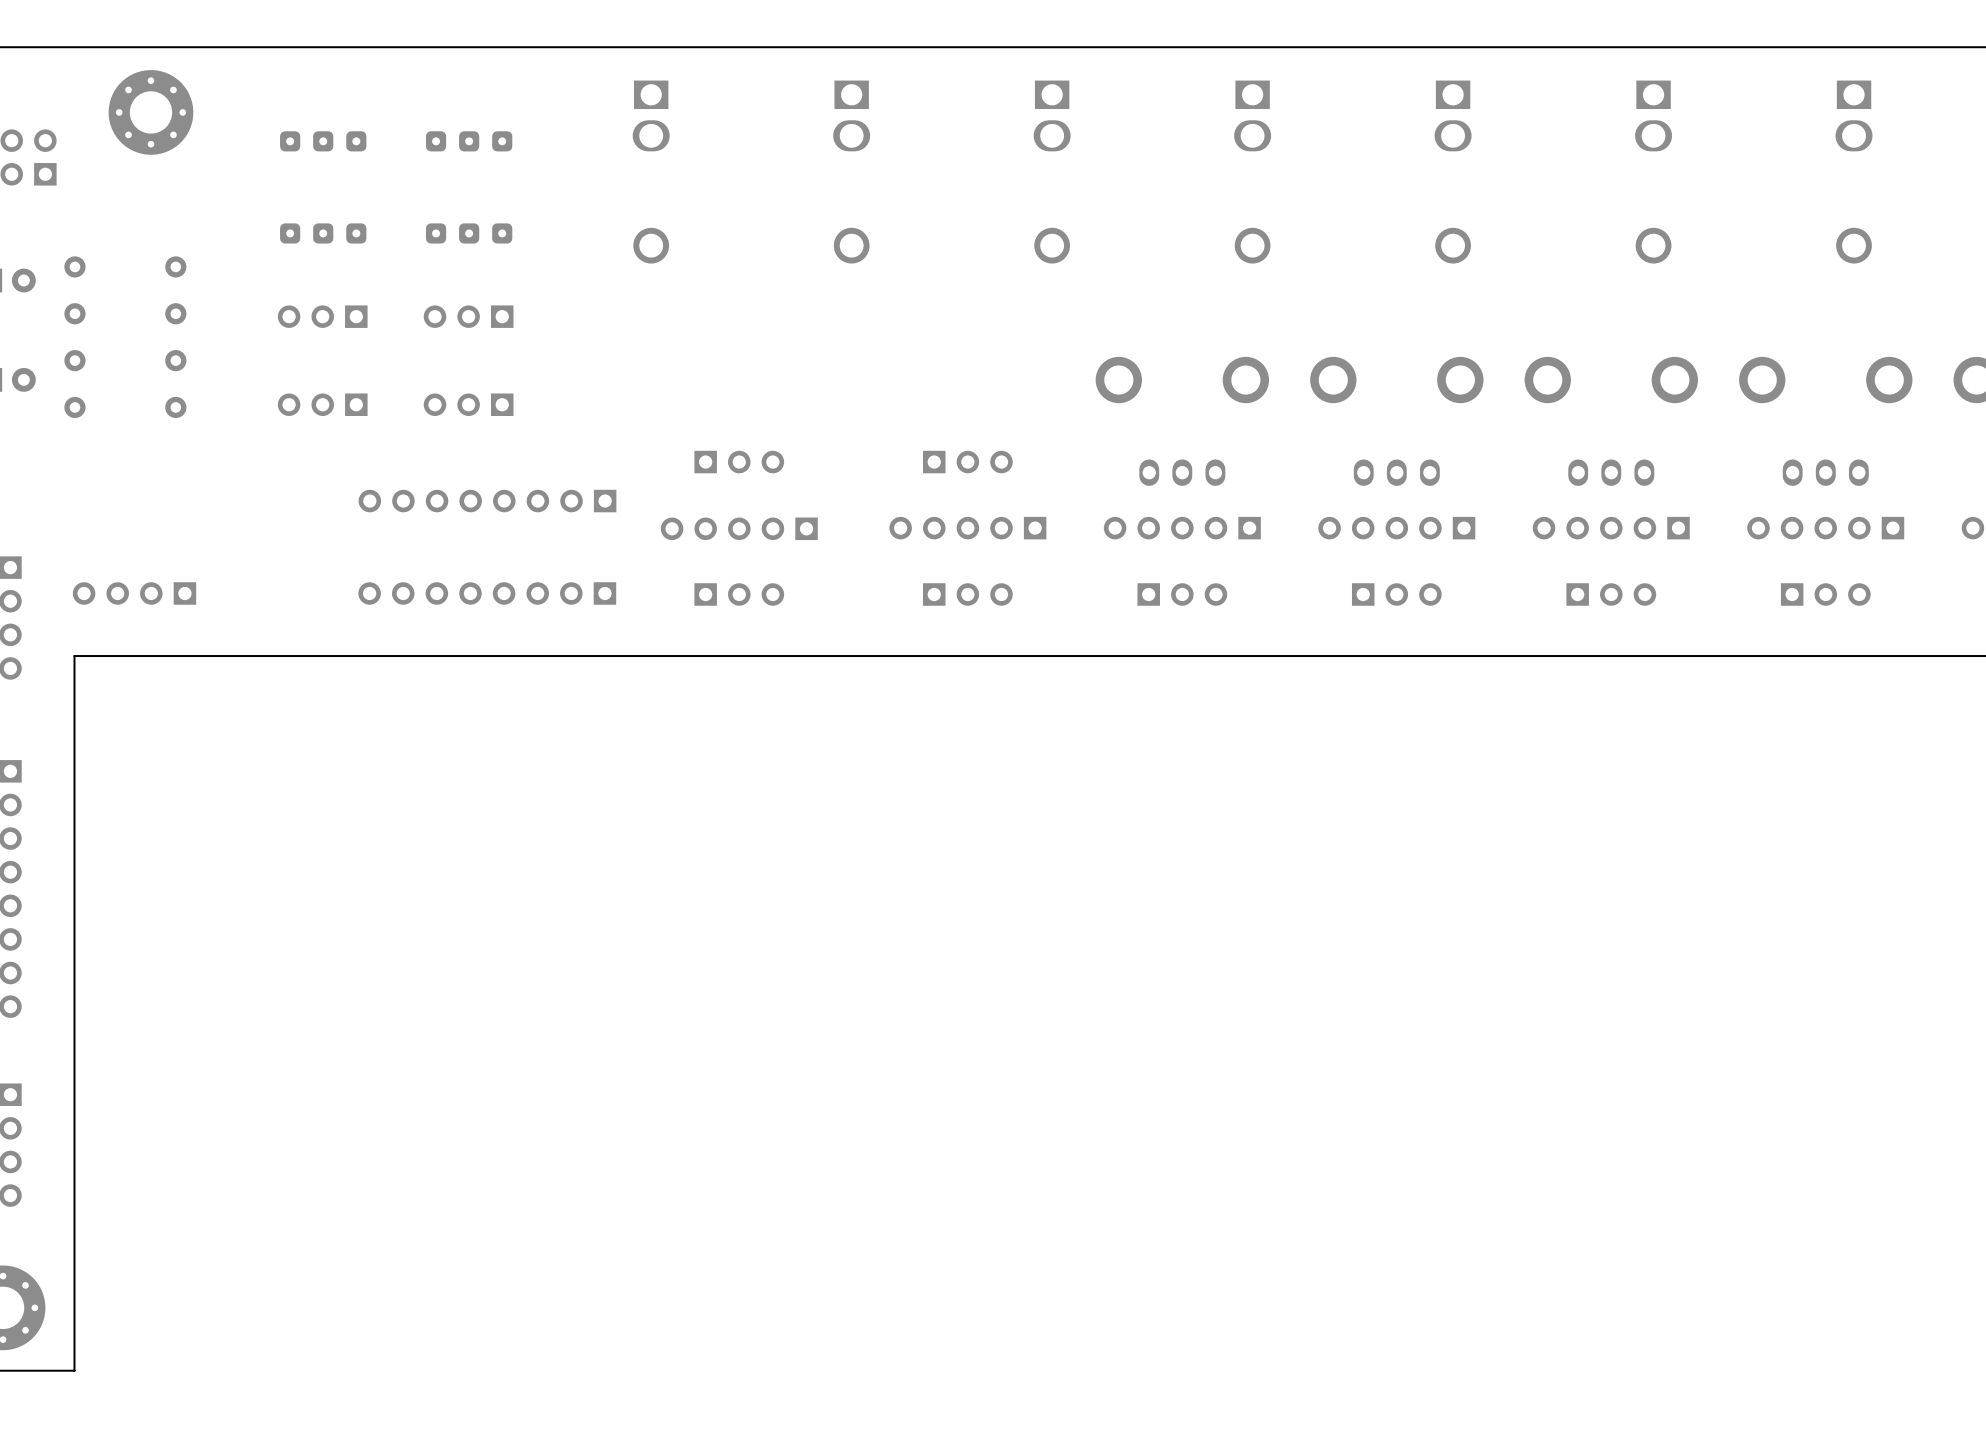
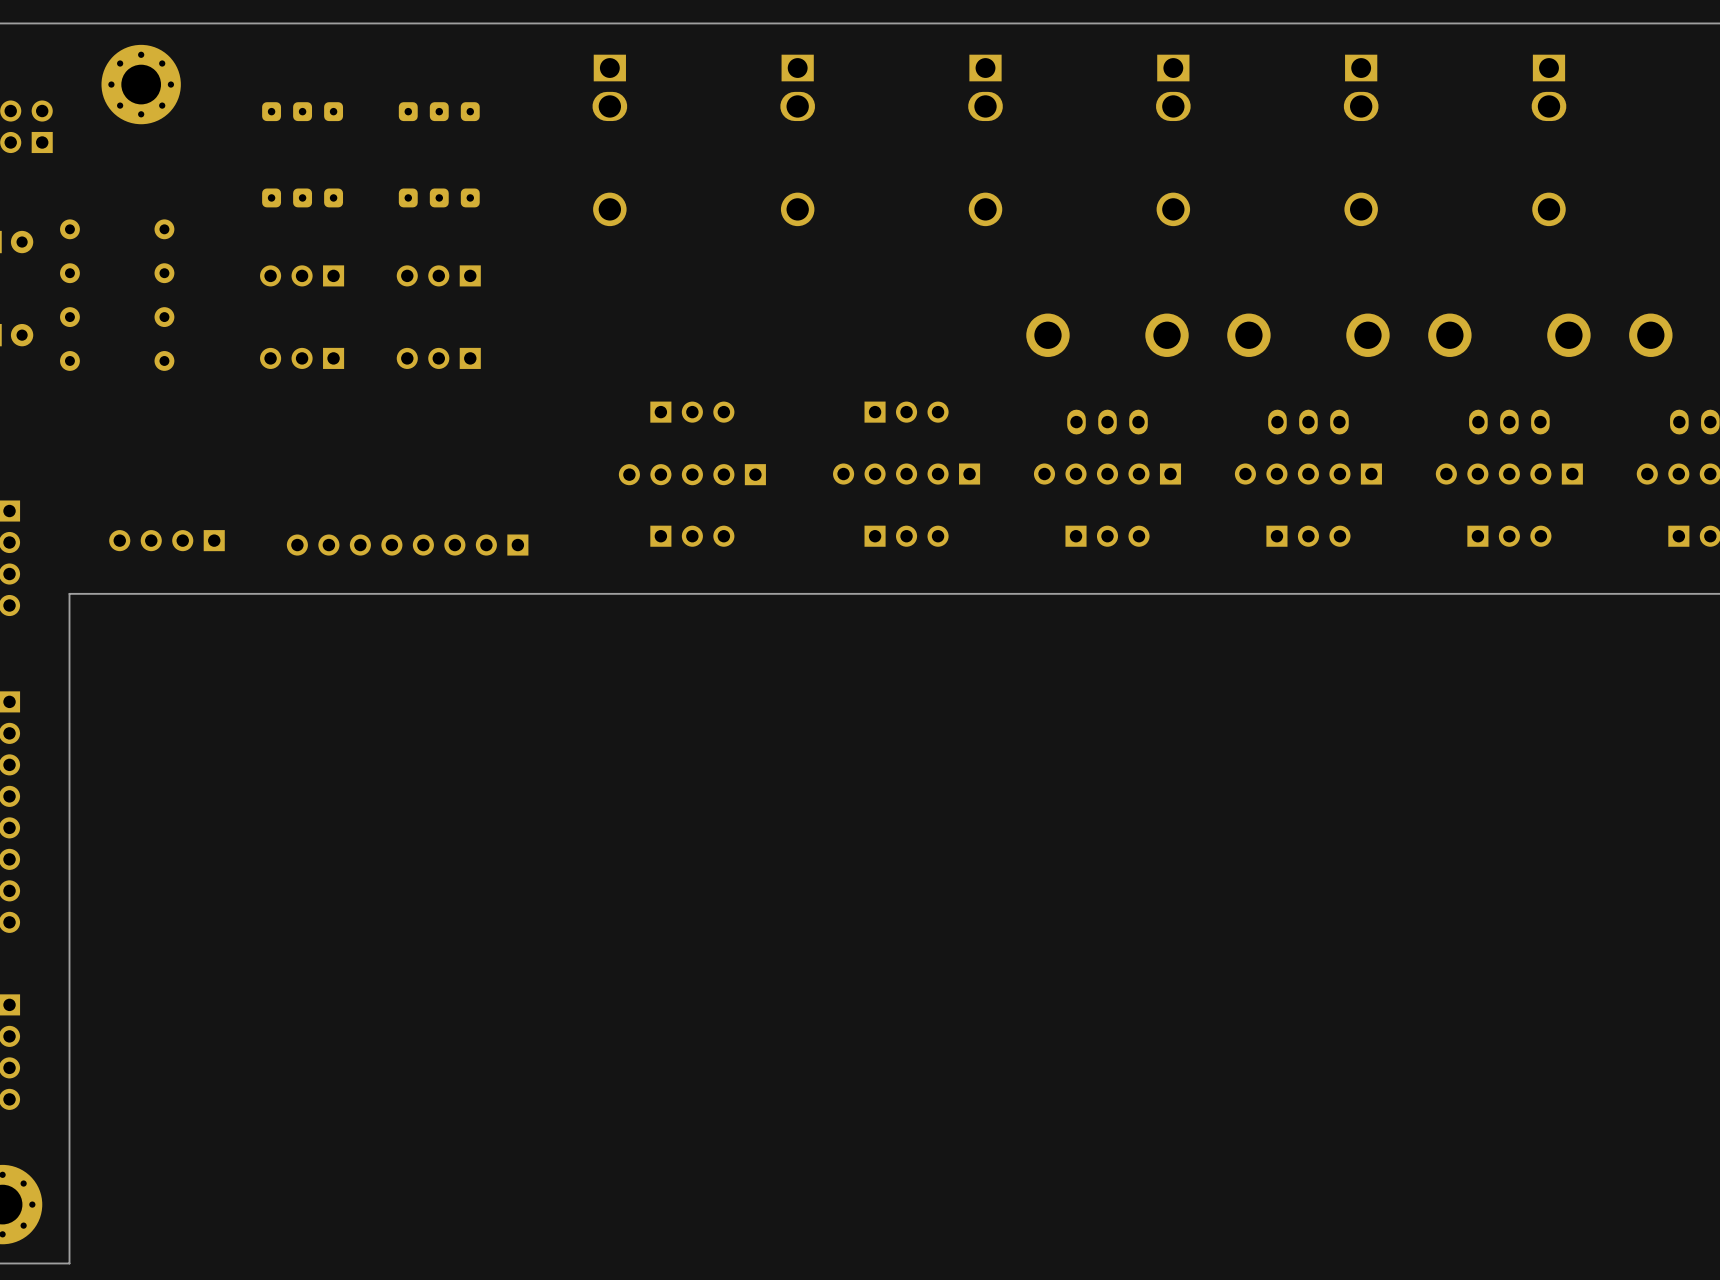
part: (487, 501) -> none
part position: (134, 593) -> (167, 540)
part position: (487, 593) -> (407, 545)

